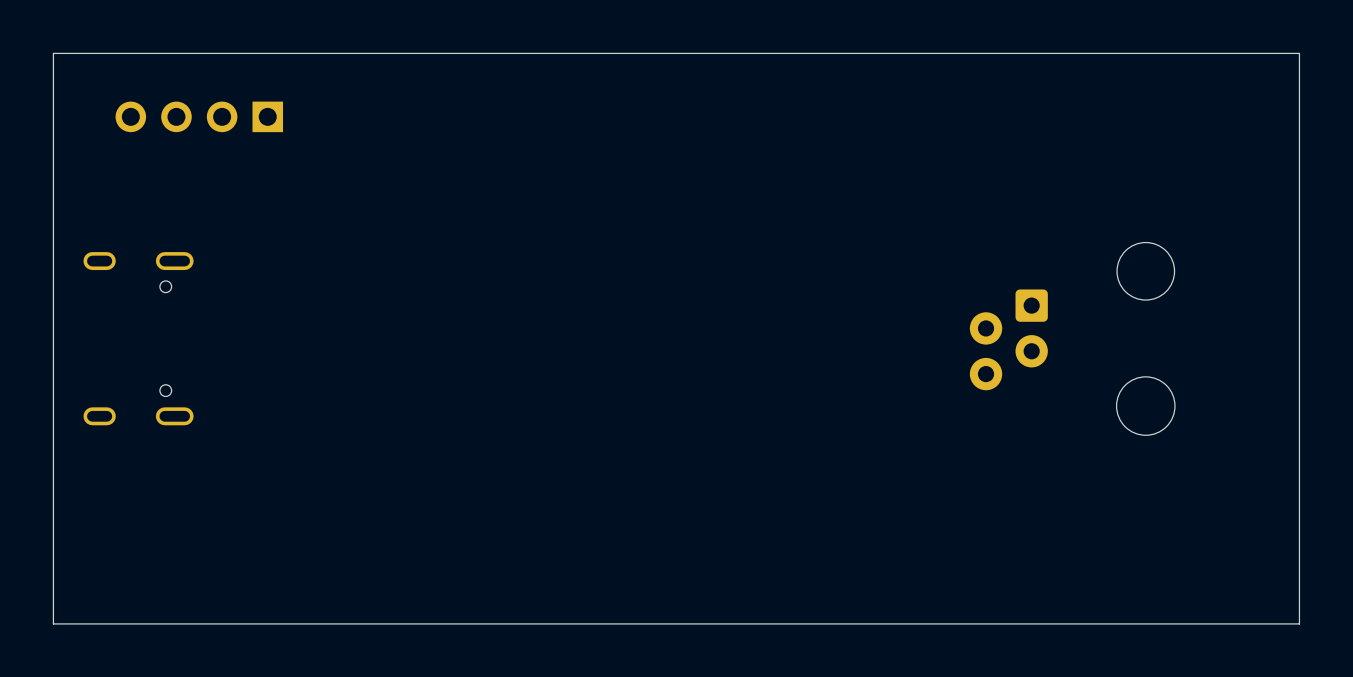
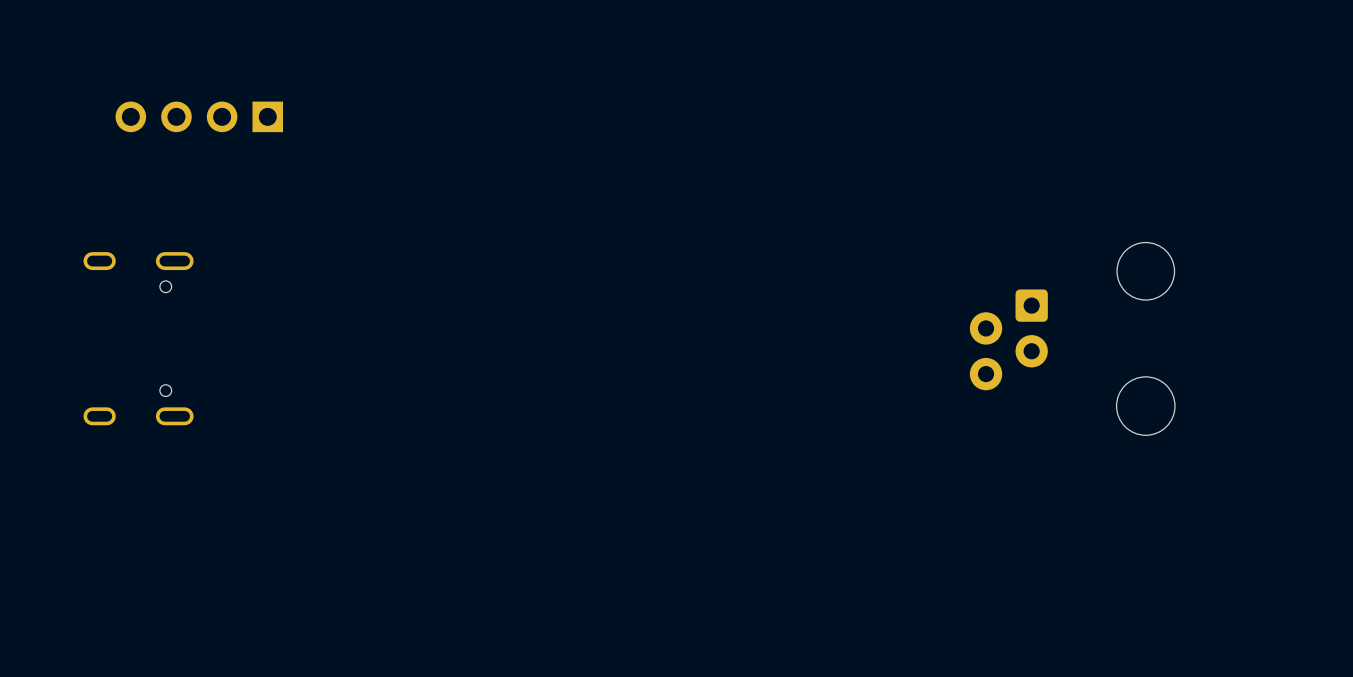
board edge: (1299, 53) (53, 53) (53, 623) (1299, 623) (1299, 53) -> none

